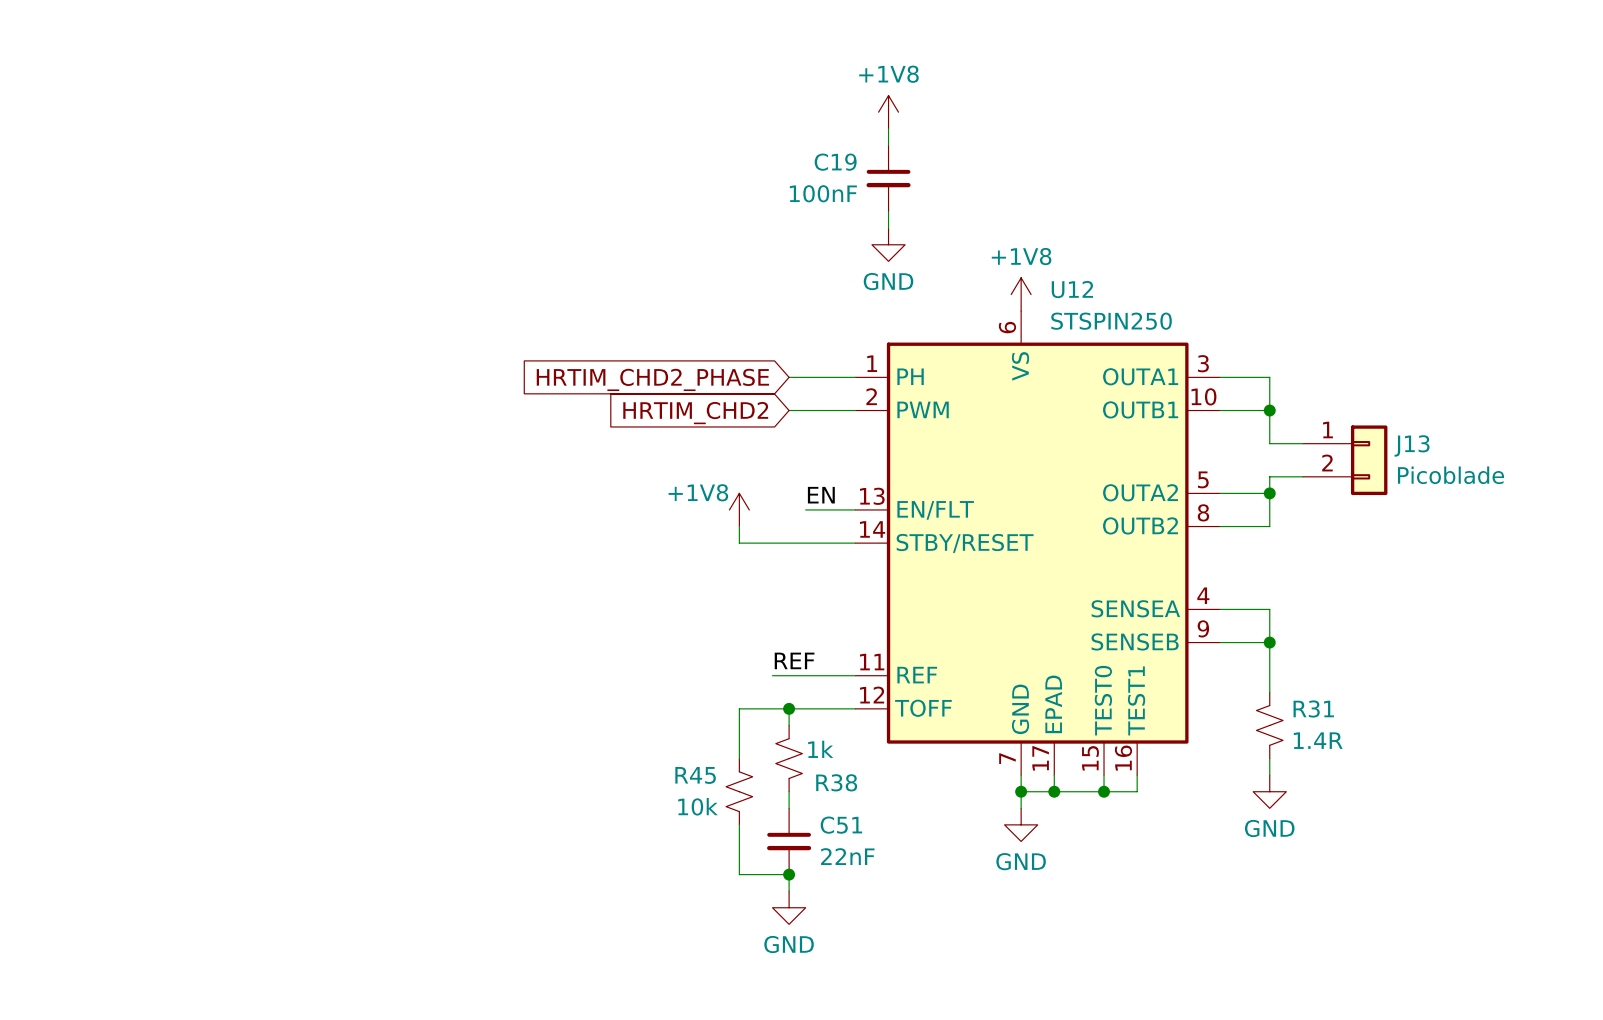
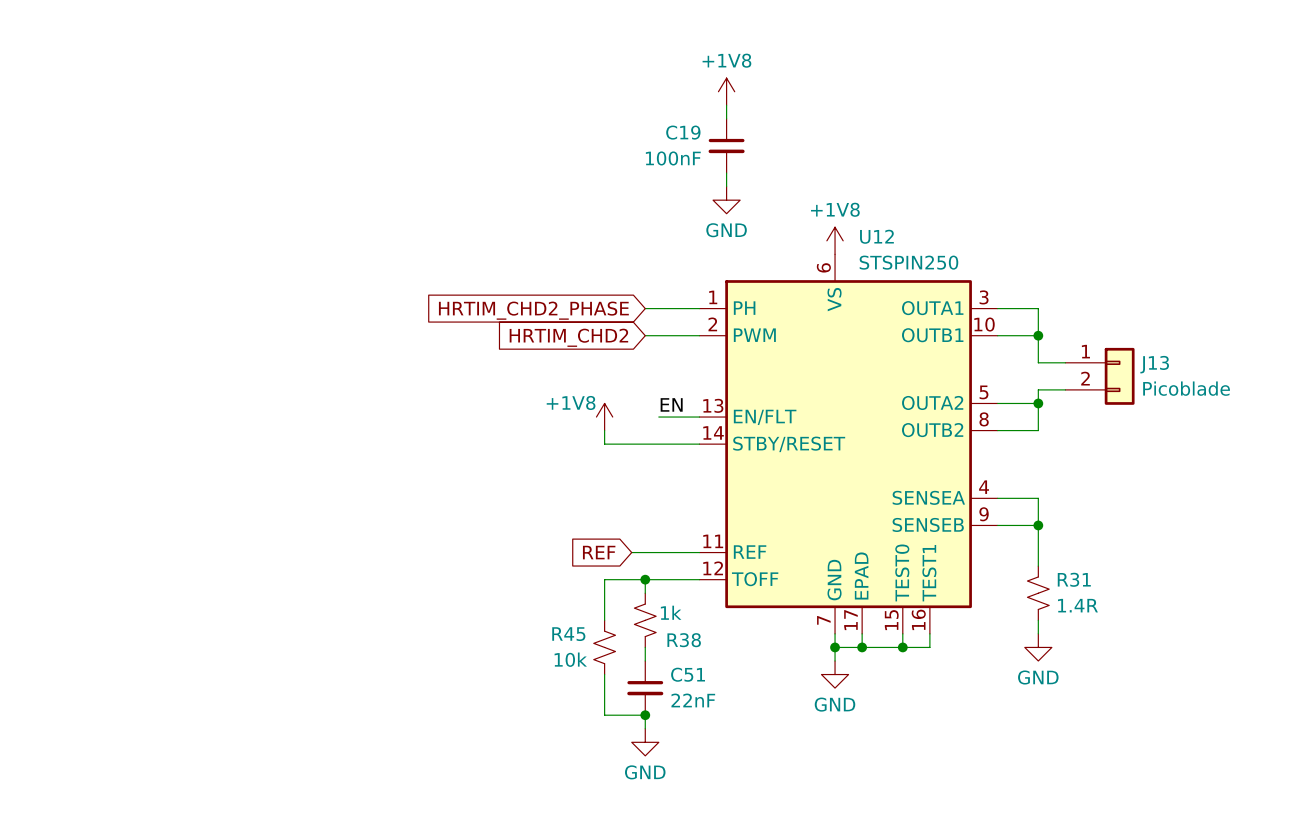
label: REF (794, 660) -> none
global label: none -> REF (599, 552)

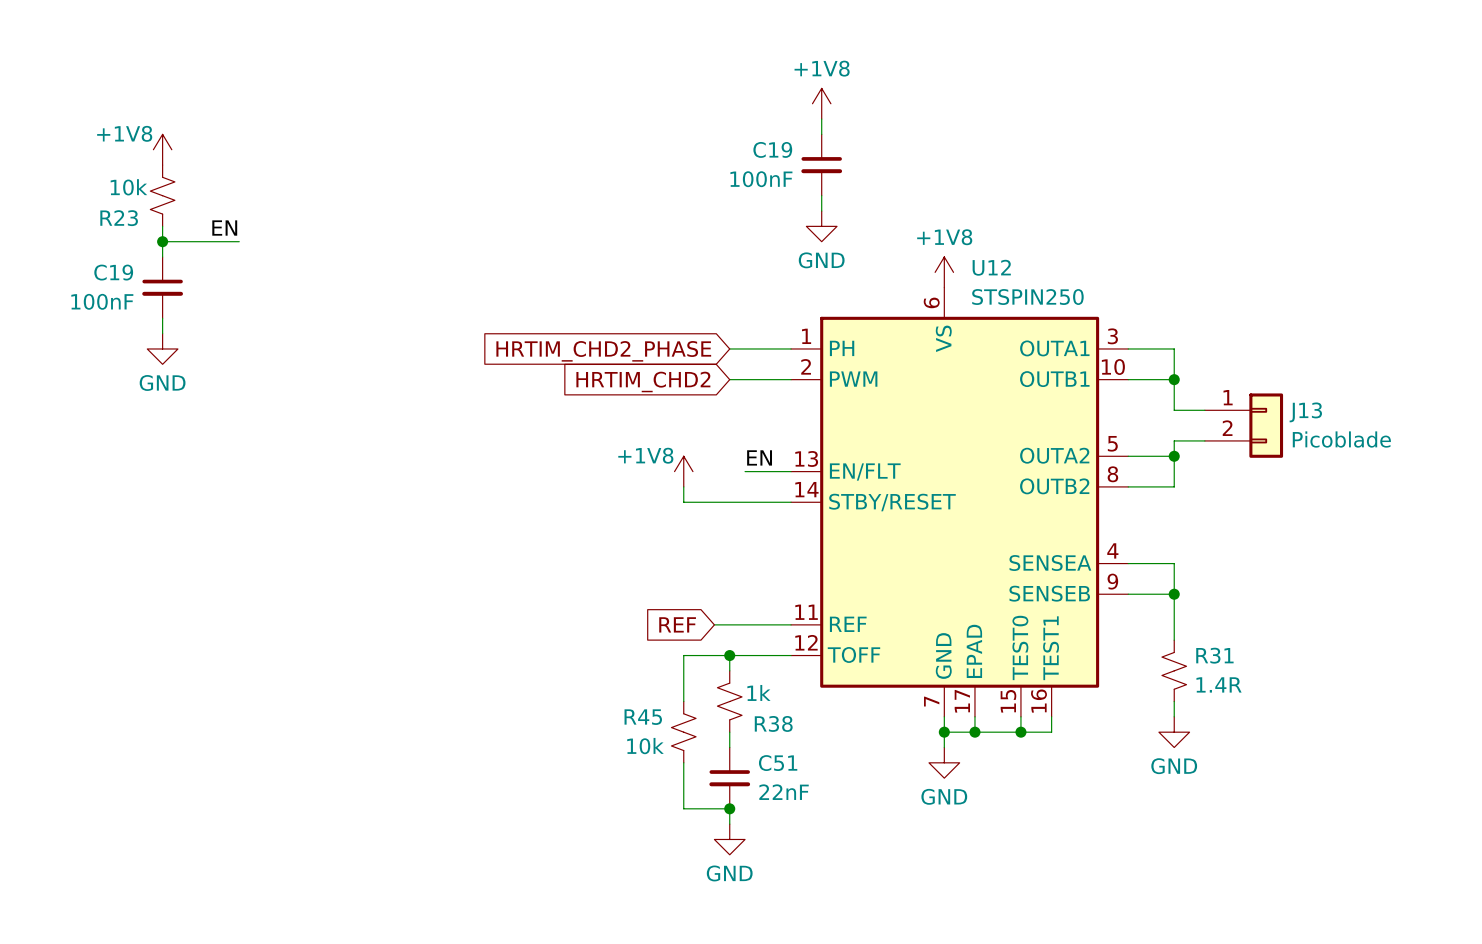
power symbol: none -> +1V8 (162, 149)
R23: none -> 10k (162, 195)
wire: none -> (162, 226) (162, 257)
label: none -> EN (224, 228)
wire: none -> (162, 241) (239, 241)
junction: none -> (162, 241)
C19: none -> 100nF (162, 287)
wire: none -> (162, 318) (162, 333)
power symbol: none -> GND (162, 348)

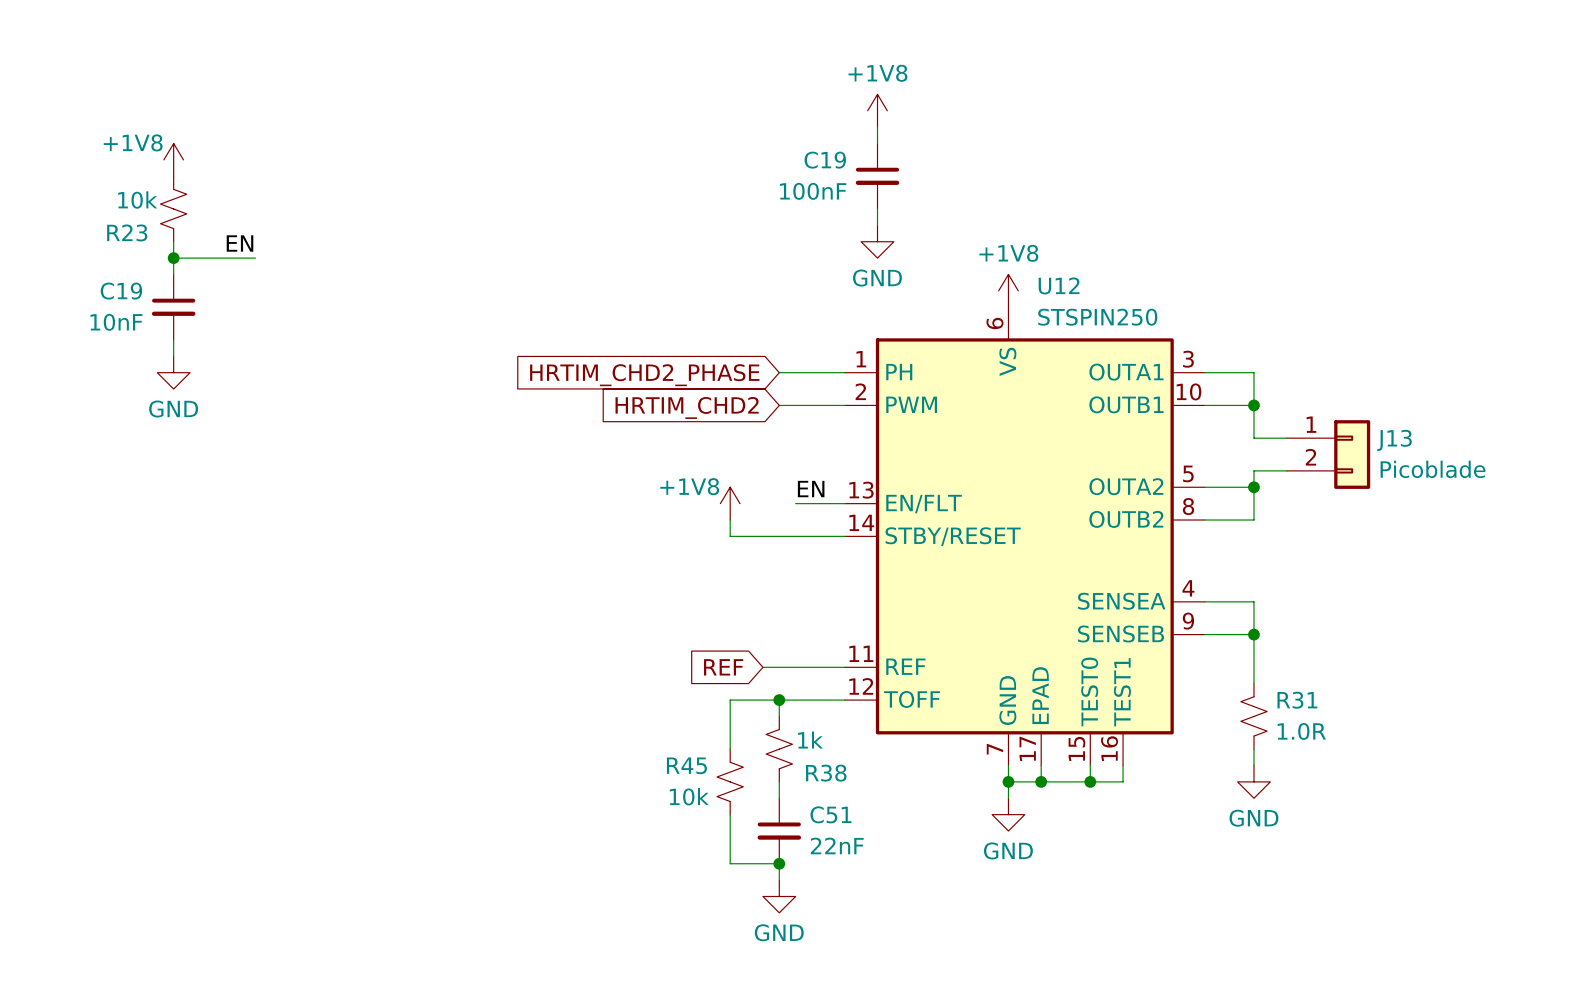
C19 value: 100nF (102, 301) -> 10nF (116, 322)
R31 value: 1.4R (1219, 684) -> 1.0R (1301, 731)

